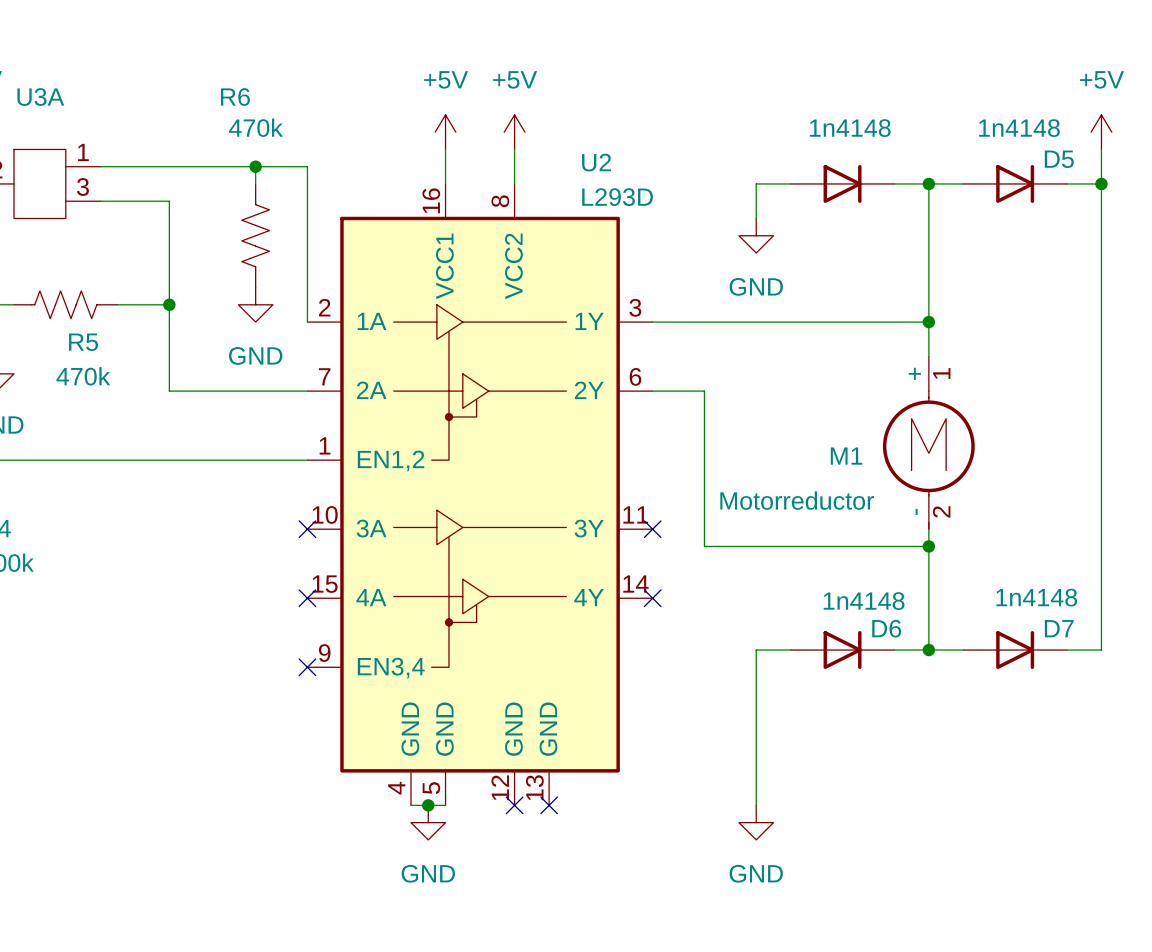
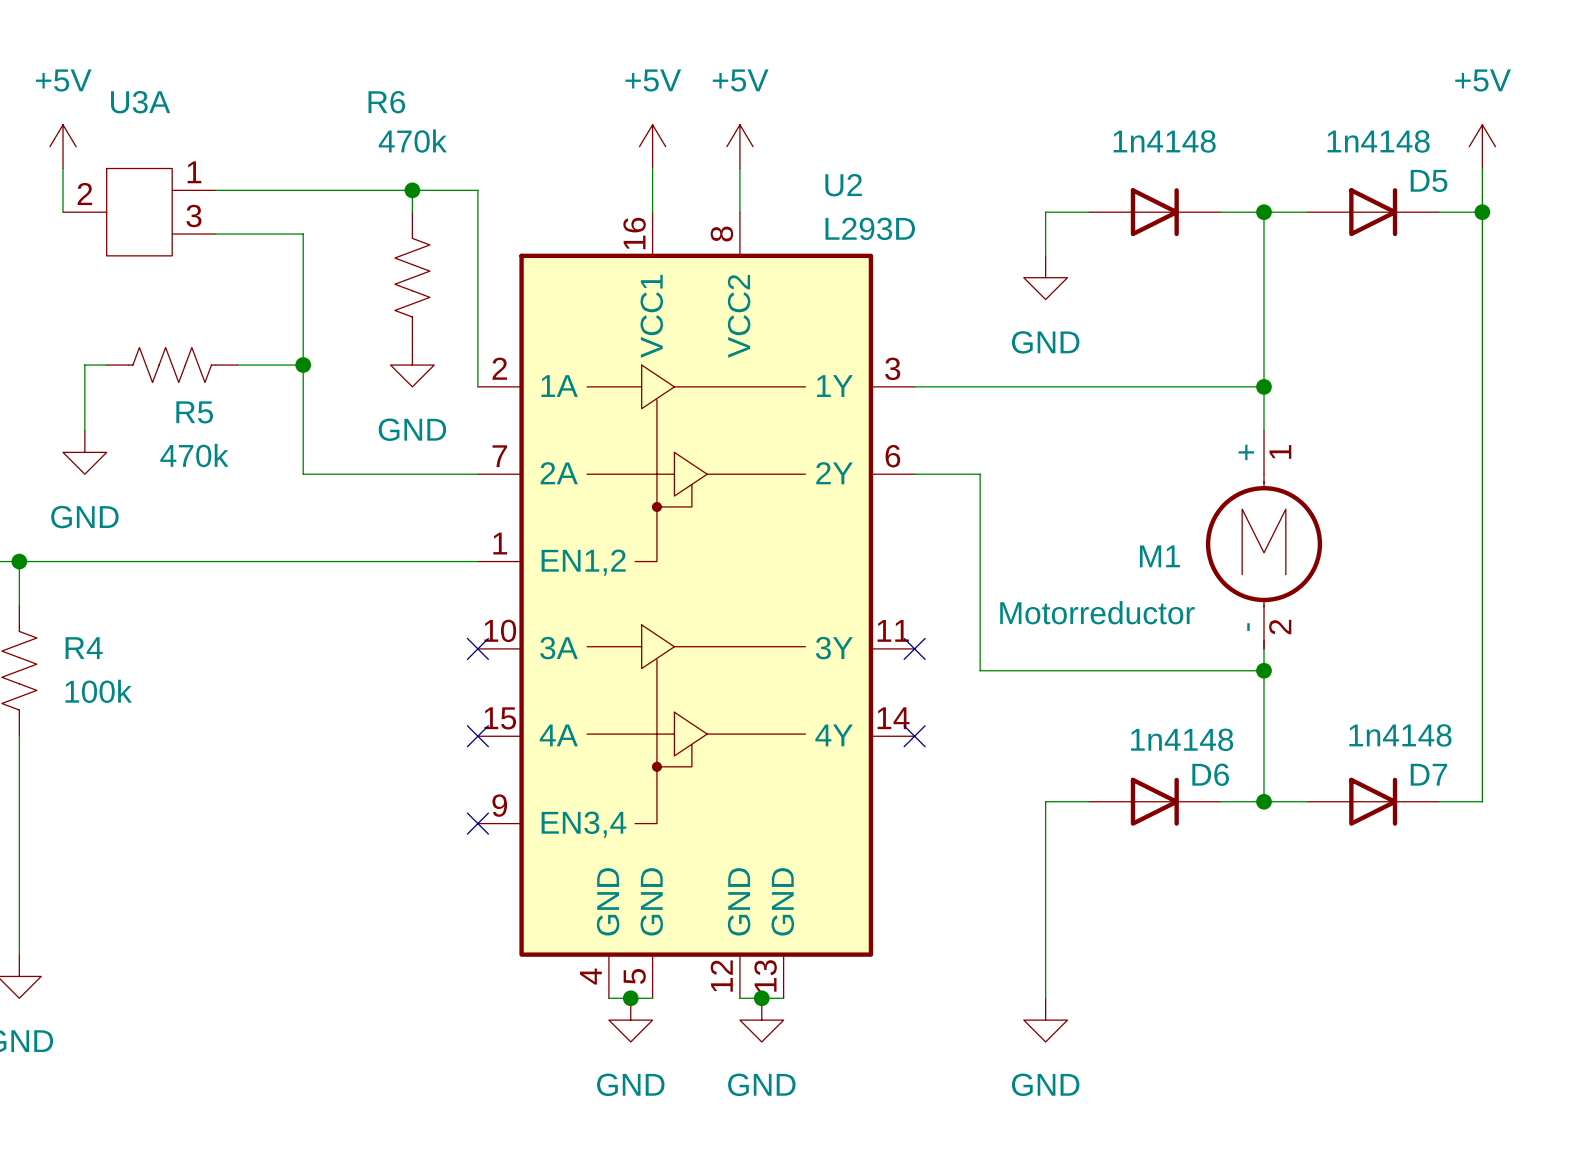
wire: none -> (739, 998) (783, 998)
no-connect mark: (514, 805) -> none
junction: none -> (761, 998)
no-connect mark: (549, 805) -> none
power symbol: none -> GND (761, 1020)

